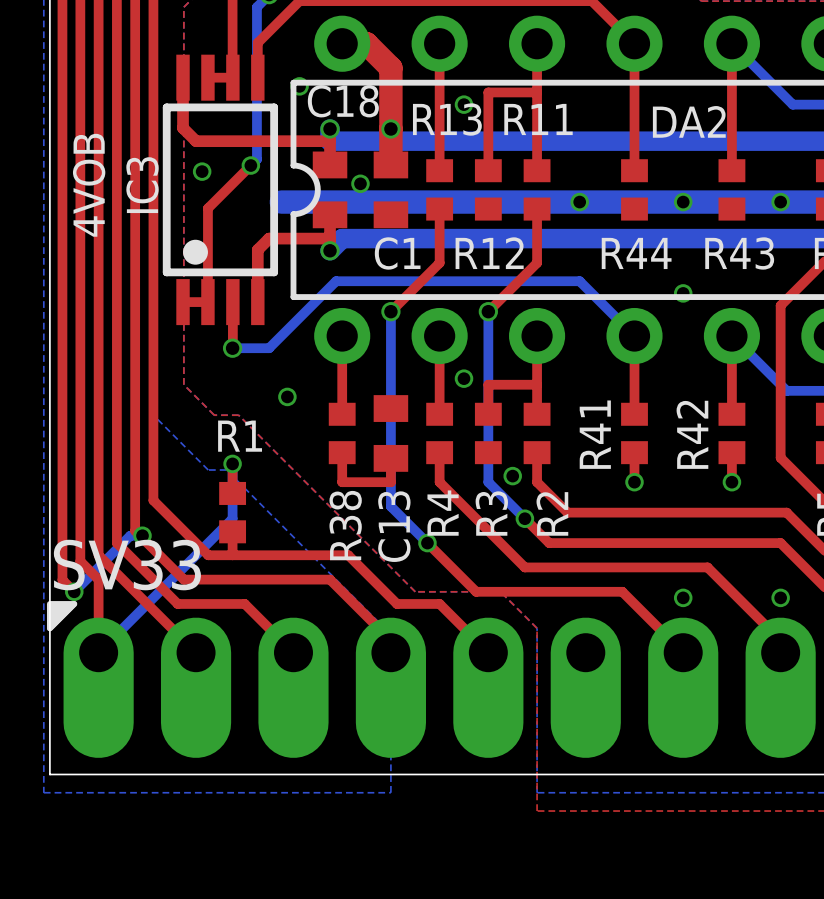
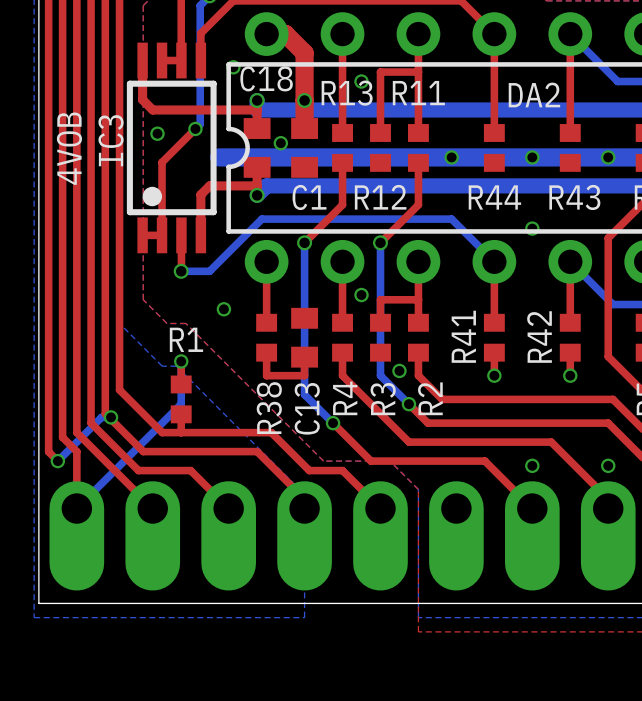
SV33: (431, 679) -> none

